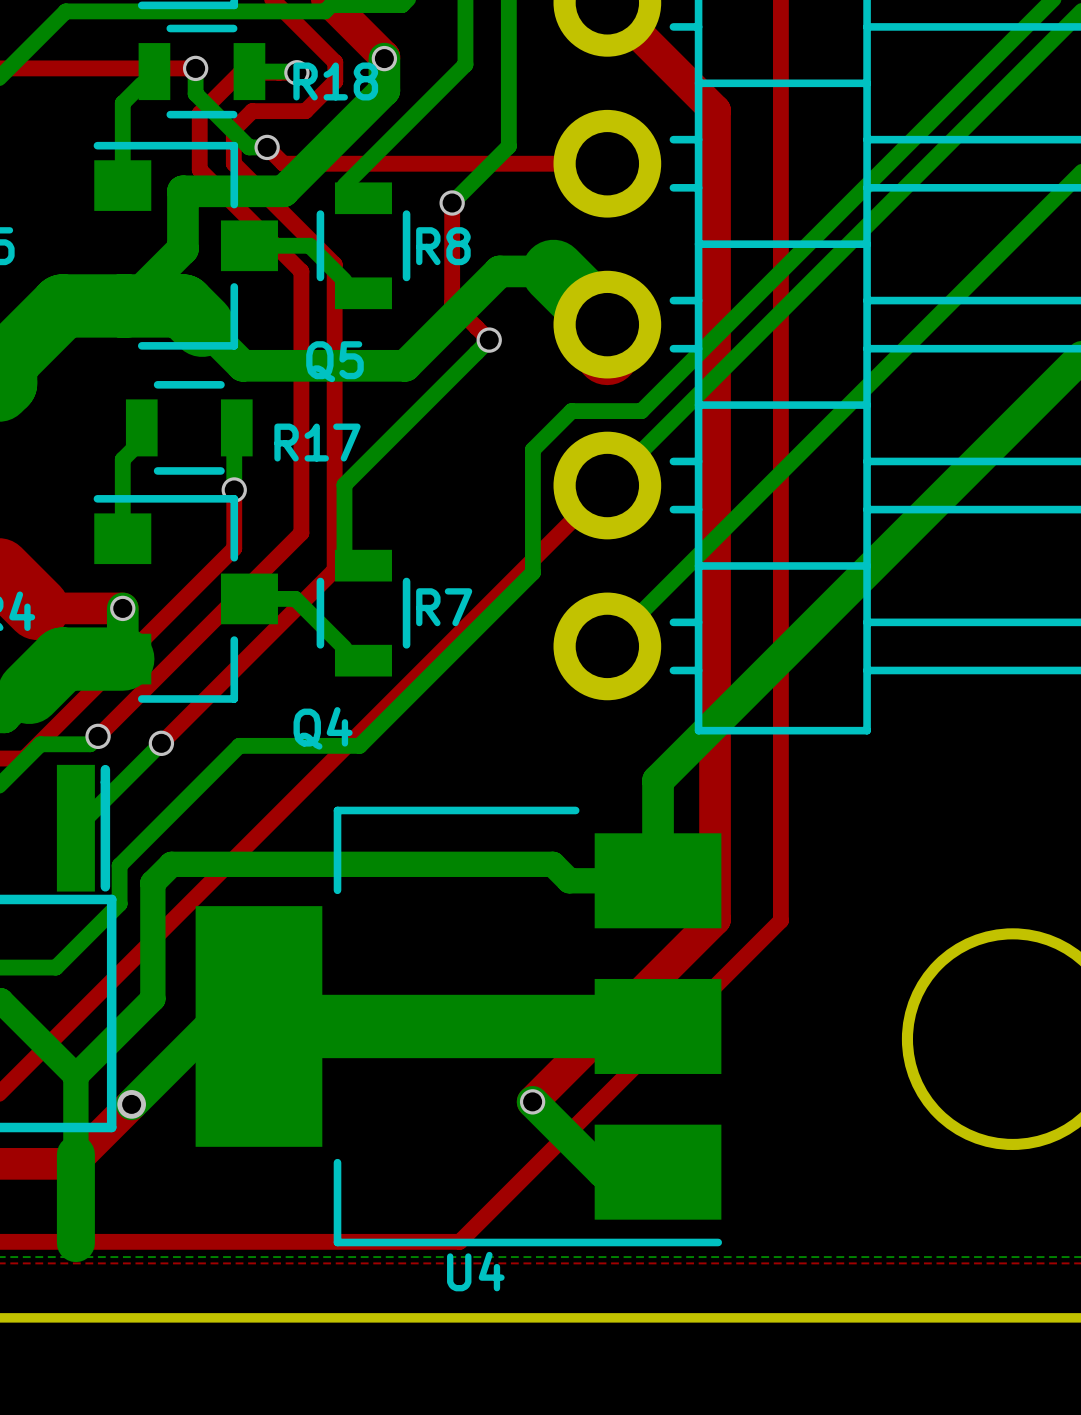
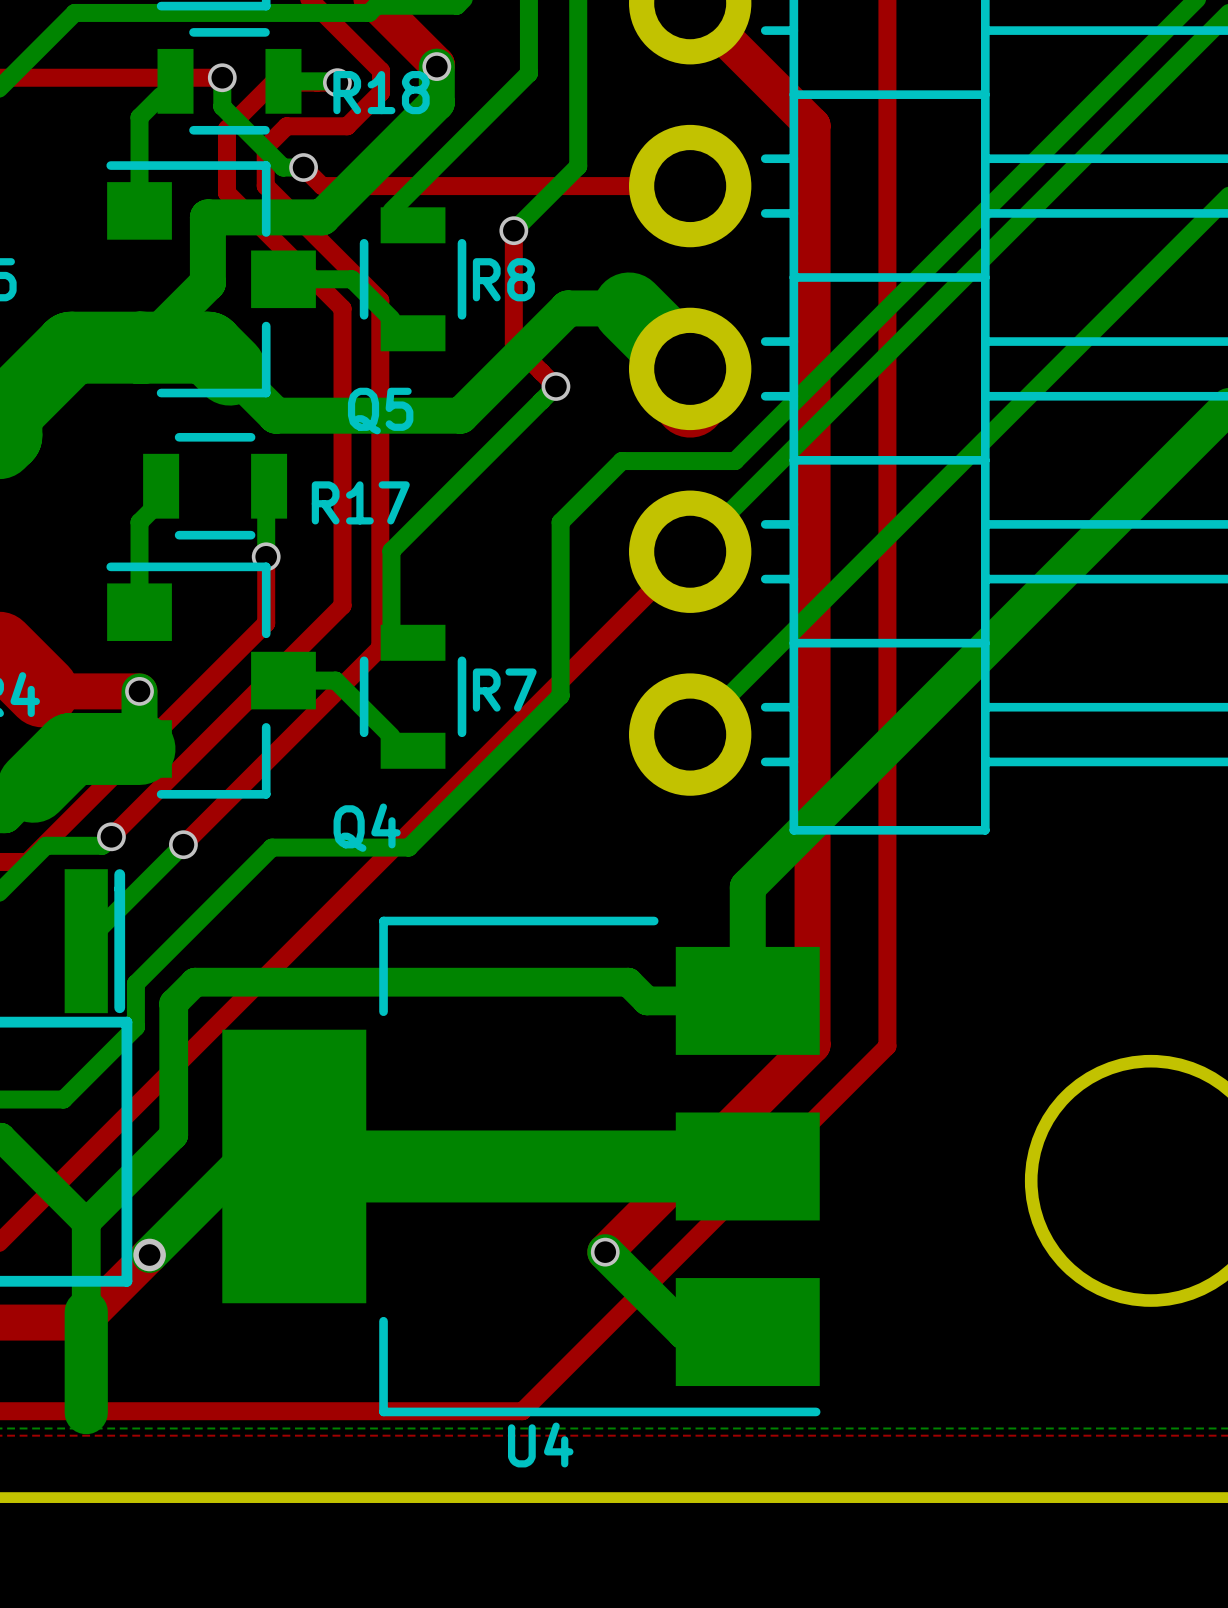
bottom track: (646, 405) (641, 411) (571, 411) (532, 449) (532, 572) (493, 612) -> (735, 461) (621, 461) (560, 522) (560, 695)

